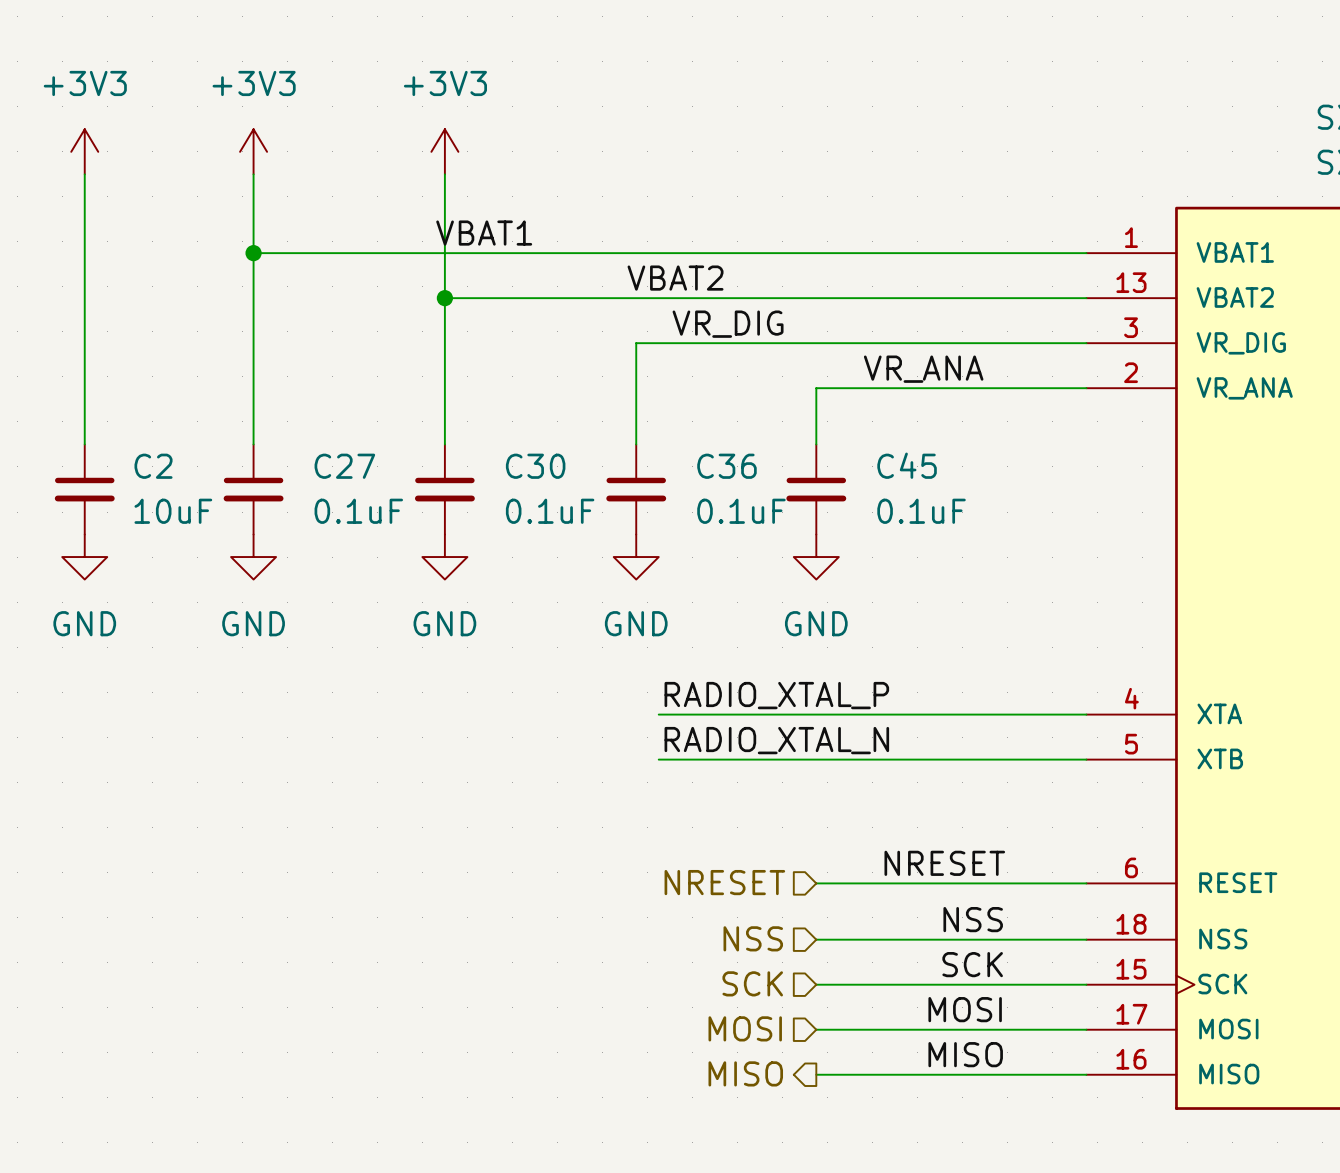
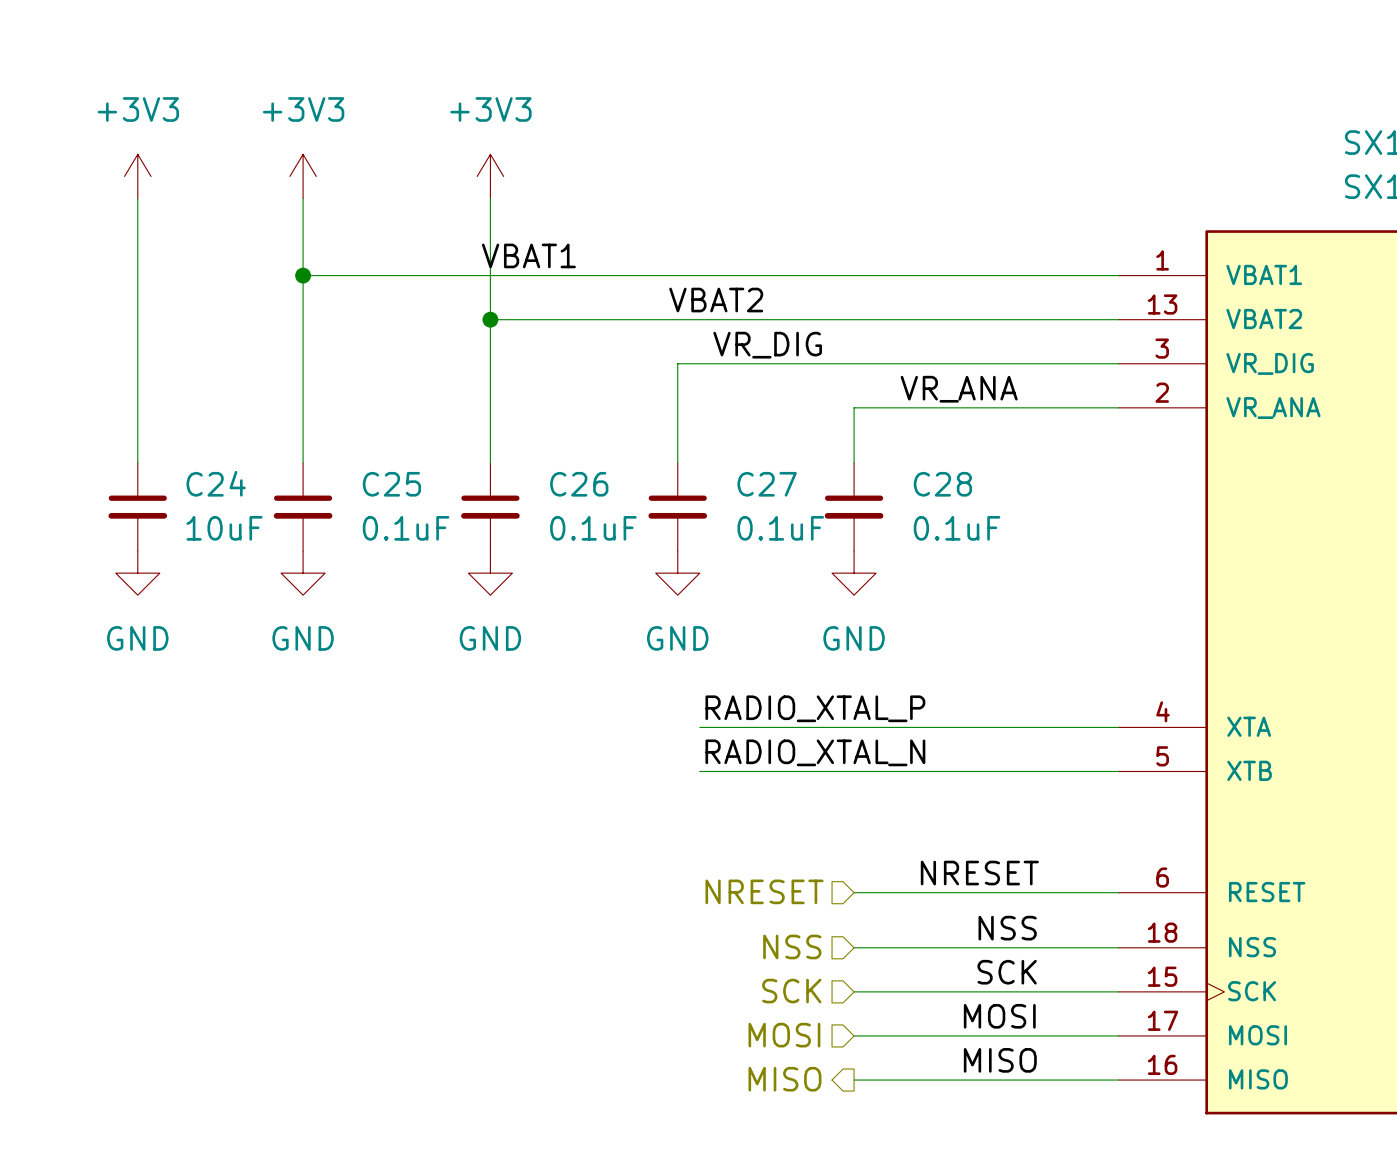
C45 name: C45 (907, 465) -> C28 (942, 484)
C2 name: C2 (153, 466) -> C24 (216, 483)
C27 name: C27 (344, 466) -> C25 (391, 484)
C30 name: C30 (535, 466) -> C26 (579, 484)
C36 name: C36 (726, 466) -> C27 (767, 484)

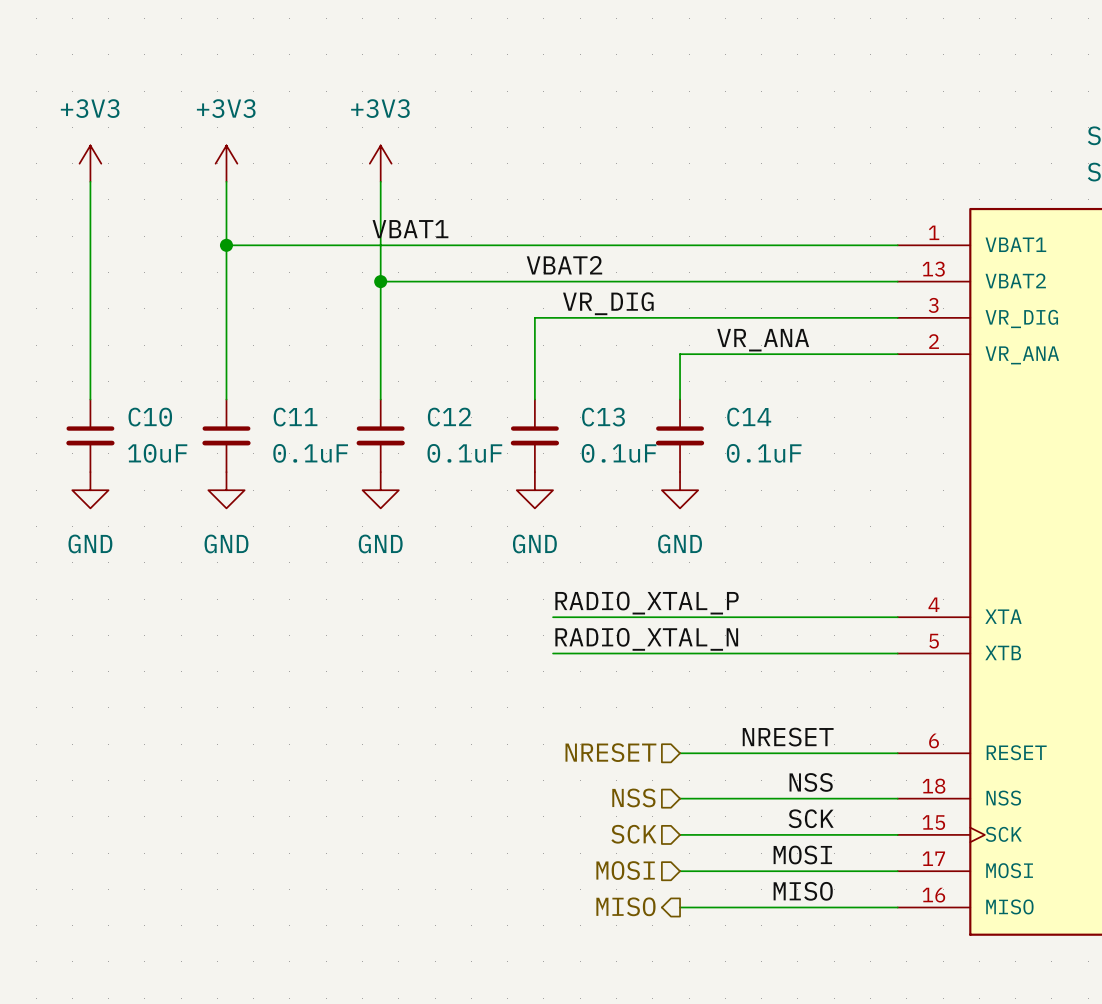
C24 name: C24 (216, 483) -> C10 (150, 417)
C25 name: C25 (391, 484) -> C11 (295, 417)
C26 name: C26 (579, 484) -> C12 (449, 417)
C27 name: C27 (767, 484) -> C13 (603, 417)
C28 name: C28 (942, 484) -> C14 (749, 417)

